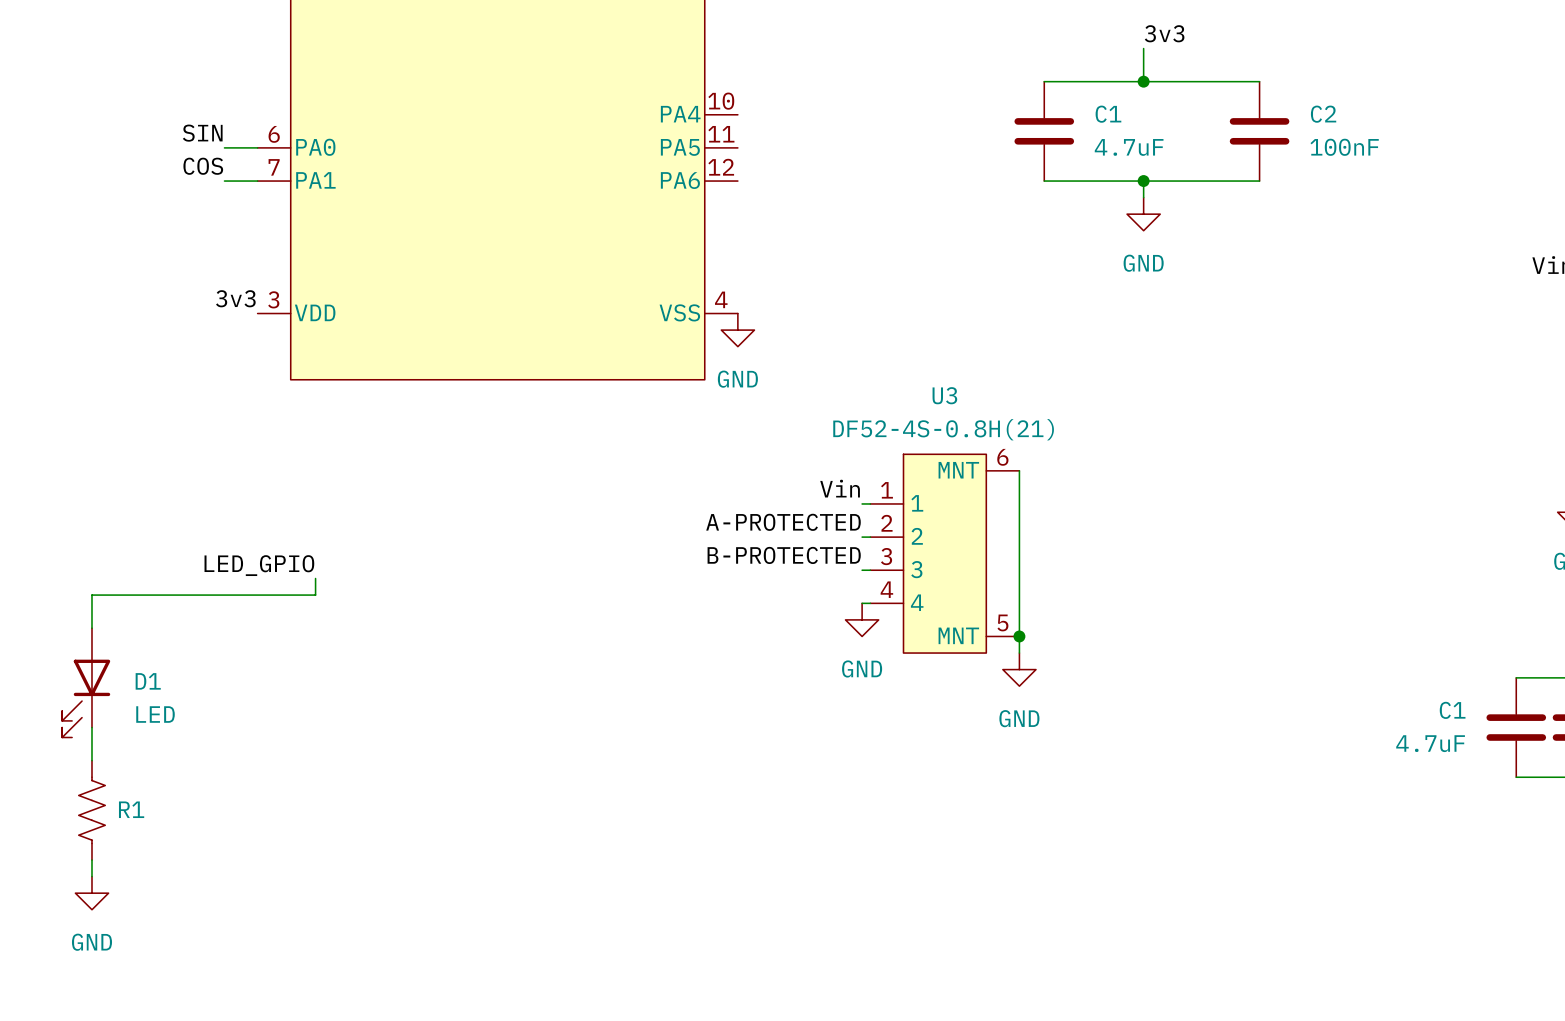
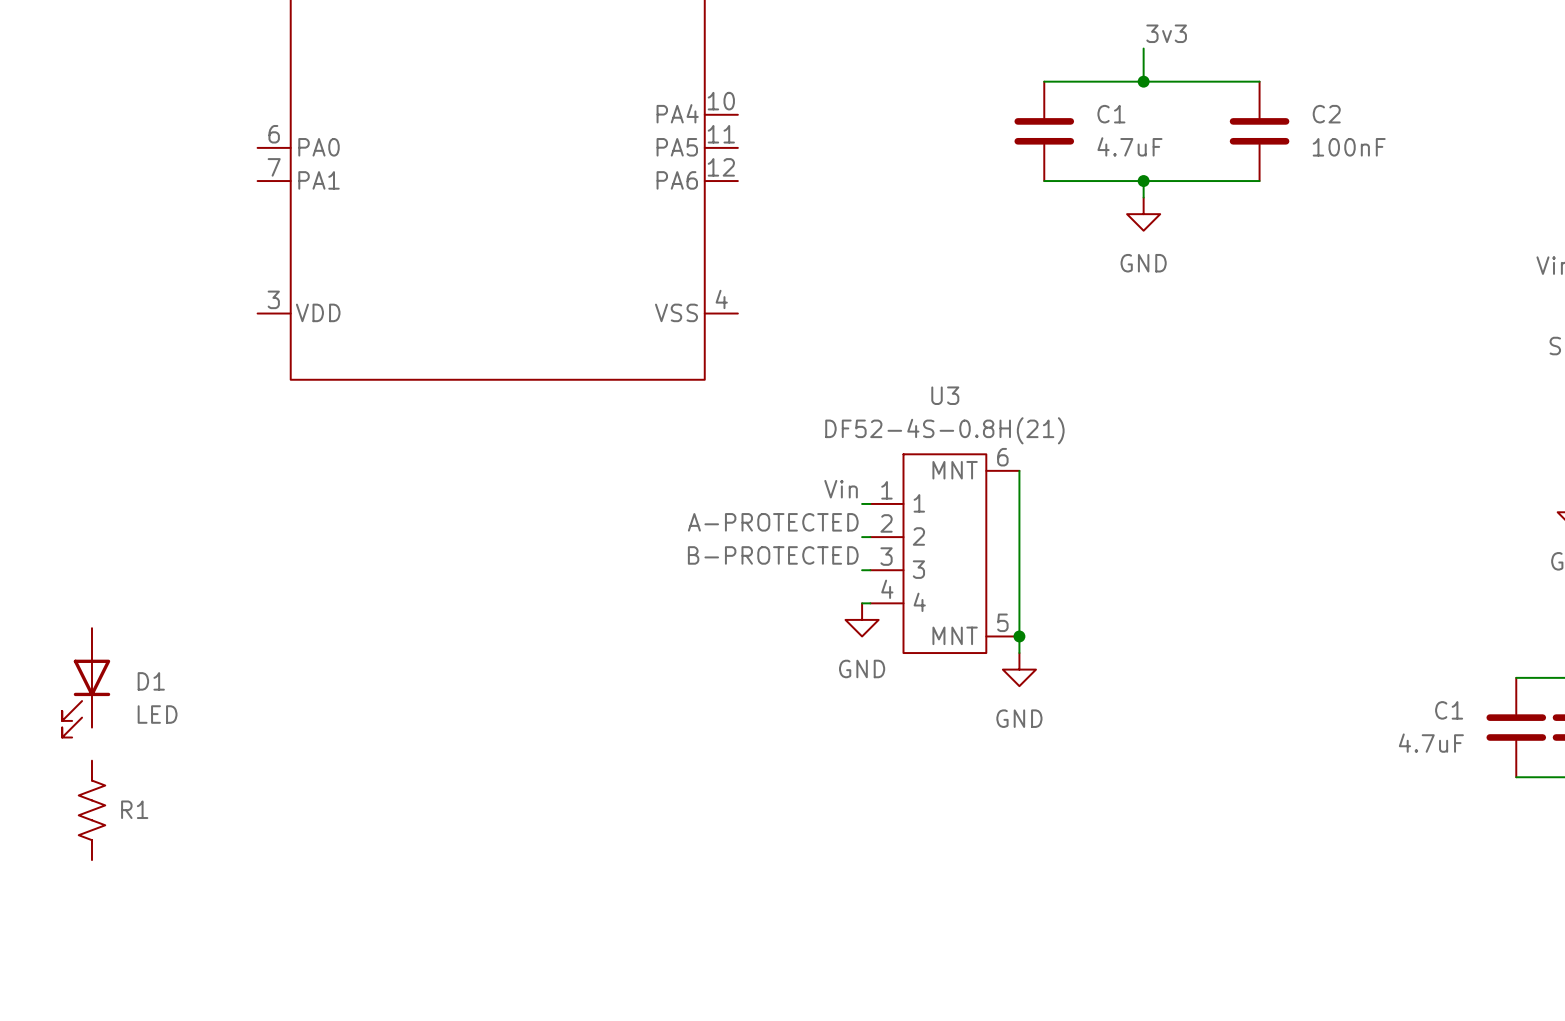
label: SIN (202, 133) -> none
wire: (224, 147) (257, 147) -> none
label: COS (203, 166) -> none
wire: (224, 181) (257, 181) -> none
label: 3v3 (235, 298) -> none
power symbol: GND (737, 330) -> none
label: LED_GPIO (259, 565) -> none
wire: (315, 578) (315, 595) (91, 595) (91, 628) -> none
wire: (91, 727) (91, 760) -> none
wire: (91, 860) (91, 876) -> none
power symbol: GND (91, 893) -> none

